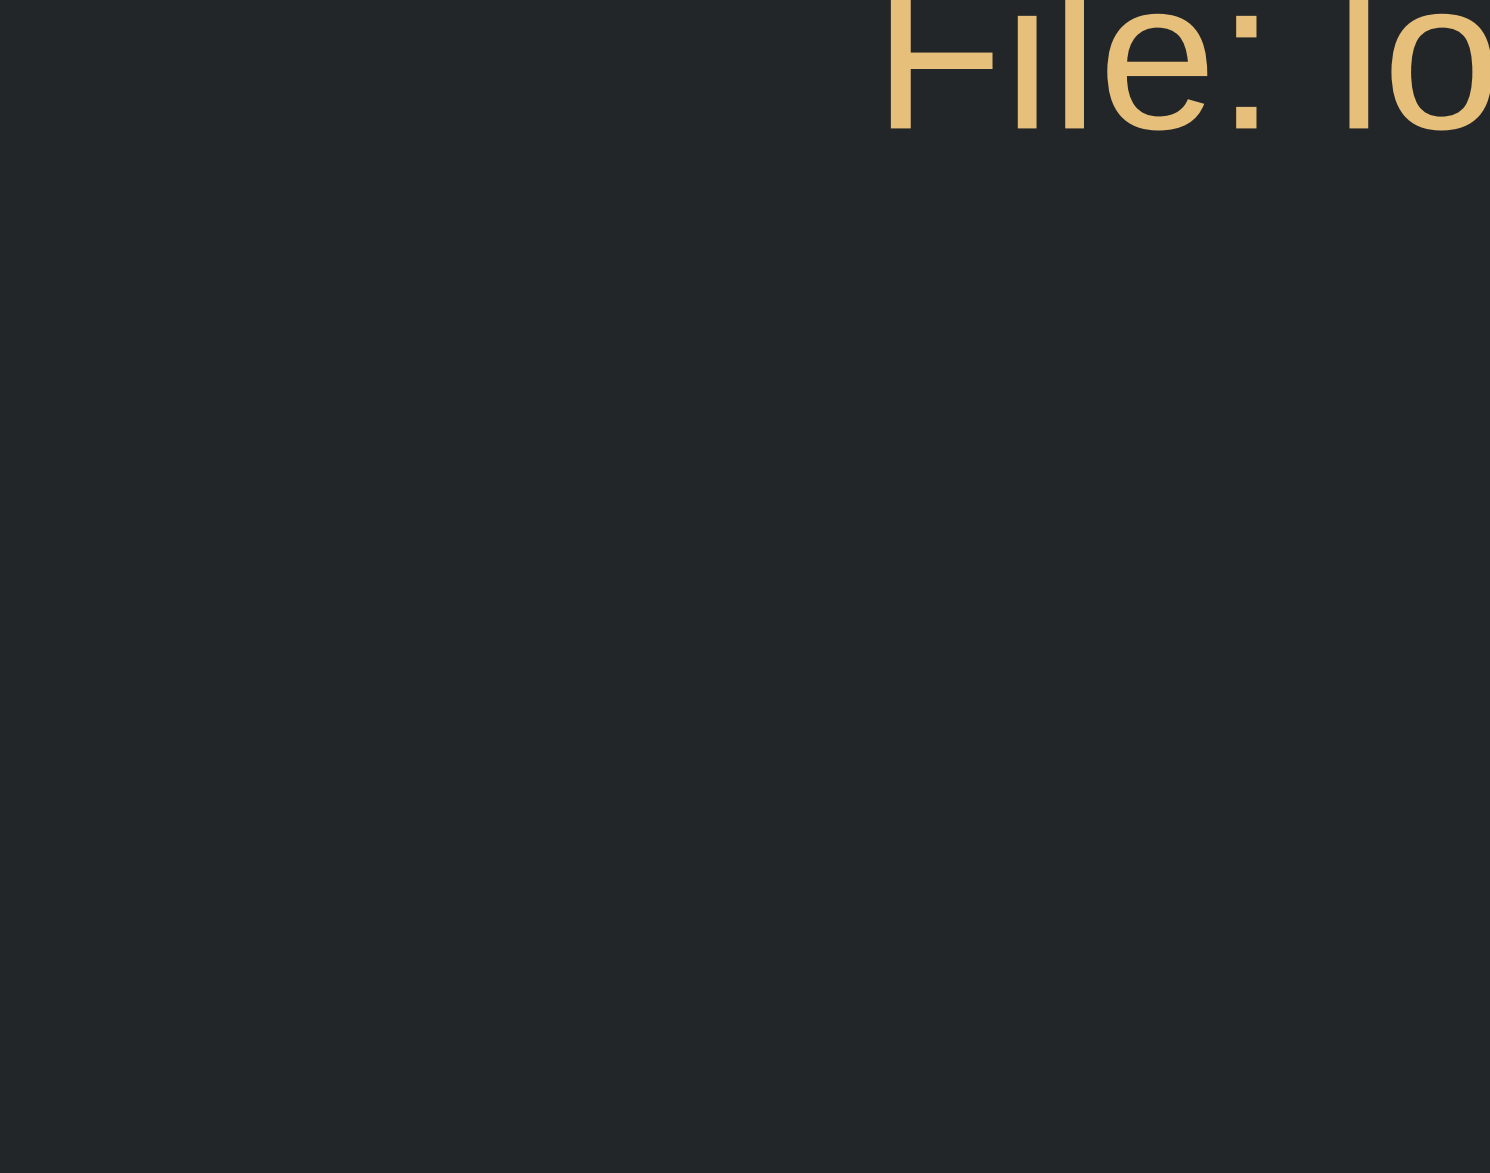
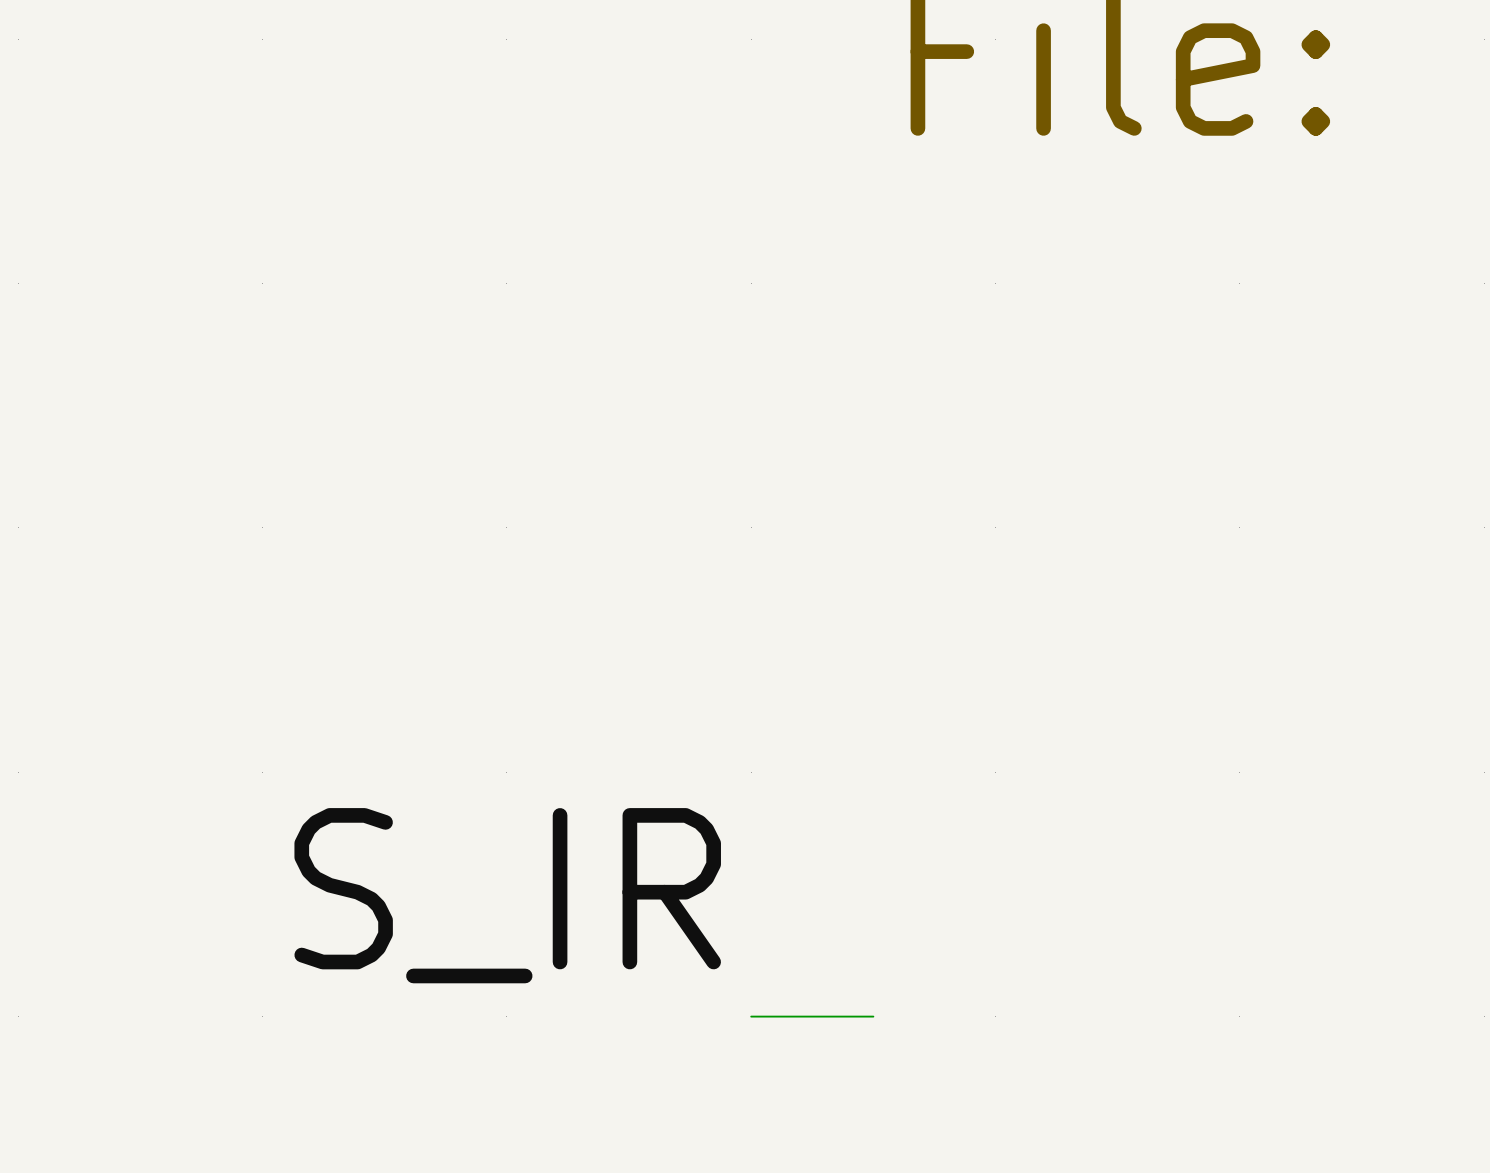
label: none -> S_IR (507, 895)
wire: none -> (751, 1016) (873, 1016)

